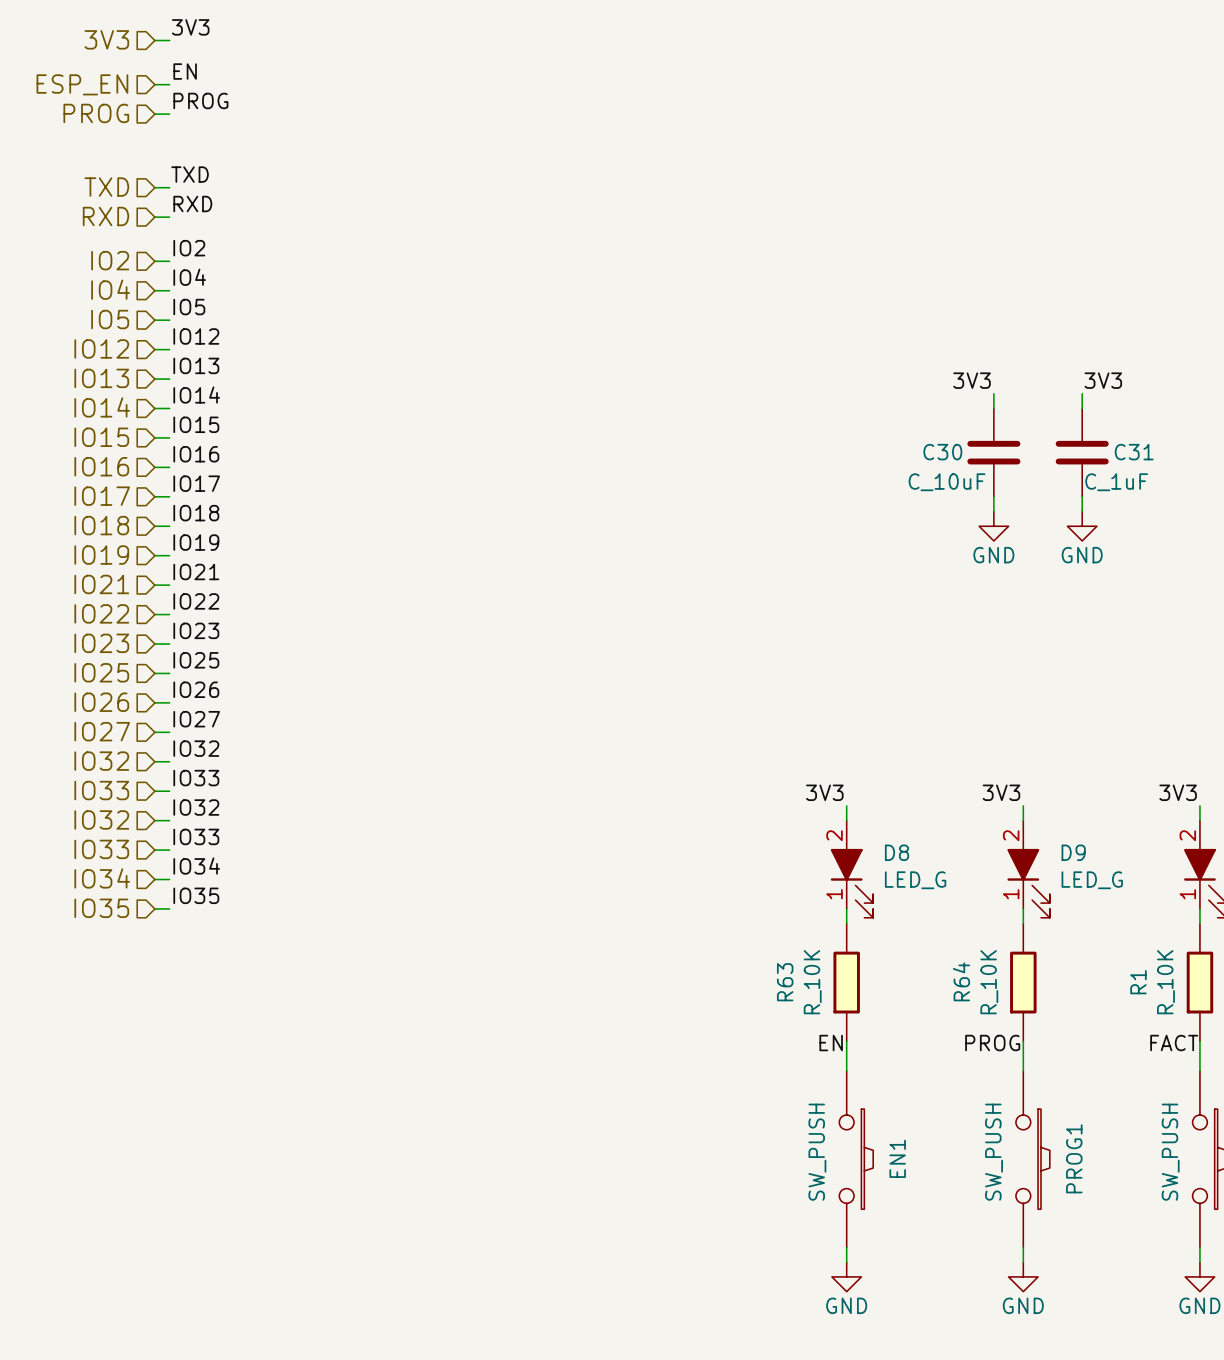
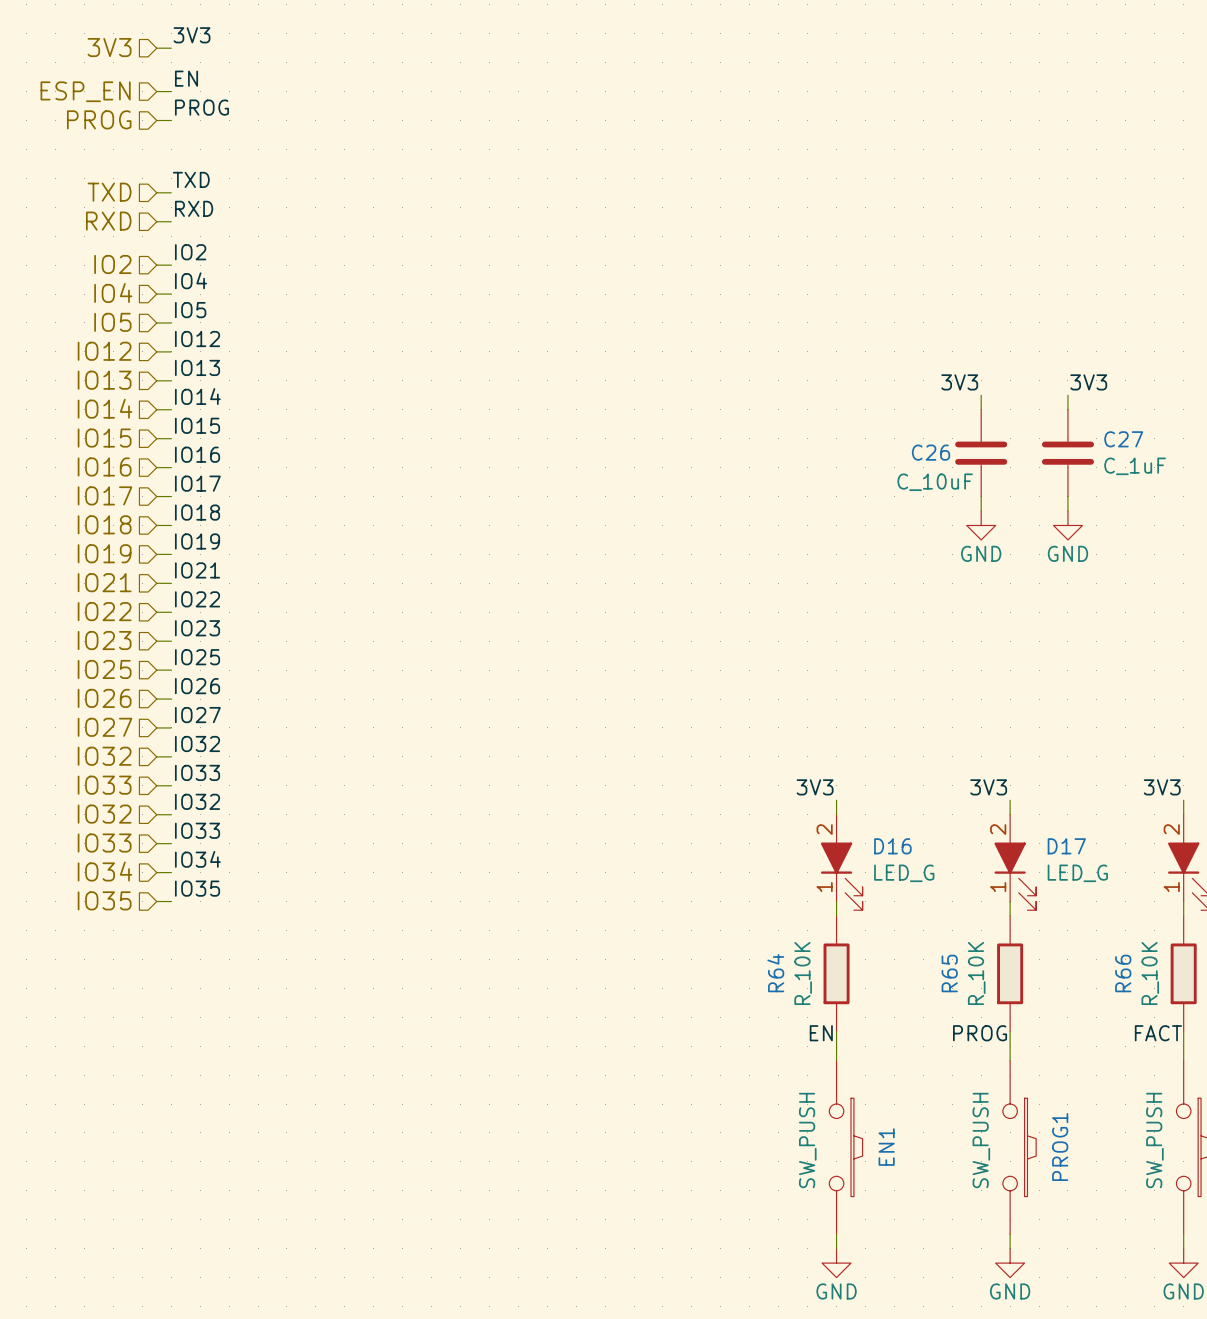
C30 name: C30 (942, 452) -> C26 (931, 452)
C31 name: C31 (1134, 452) -> C27 (1123, 439)
C31 value position: C_1uF (1116, 482) -> C_1uF (1135, 466)
D8 name: D8 (897, 852) -> D16 (892, 846)
D9 name: D9 (1073, 852) -> D17 (1066, 846)
R64 name: R64 (961, 981) -> R65 (949, 973)
R63 name: R63 (785, 982) -> R64 (775, 973)
R1 name: R1 (1138, 982) -> R66 (1123, 973)

